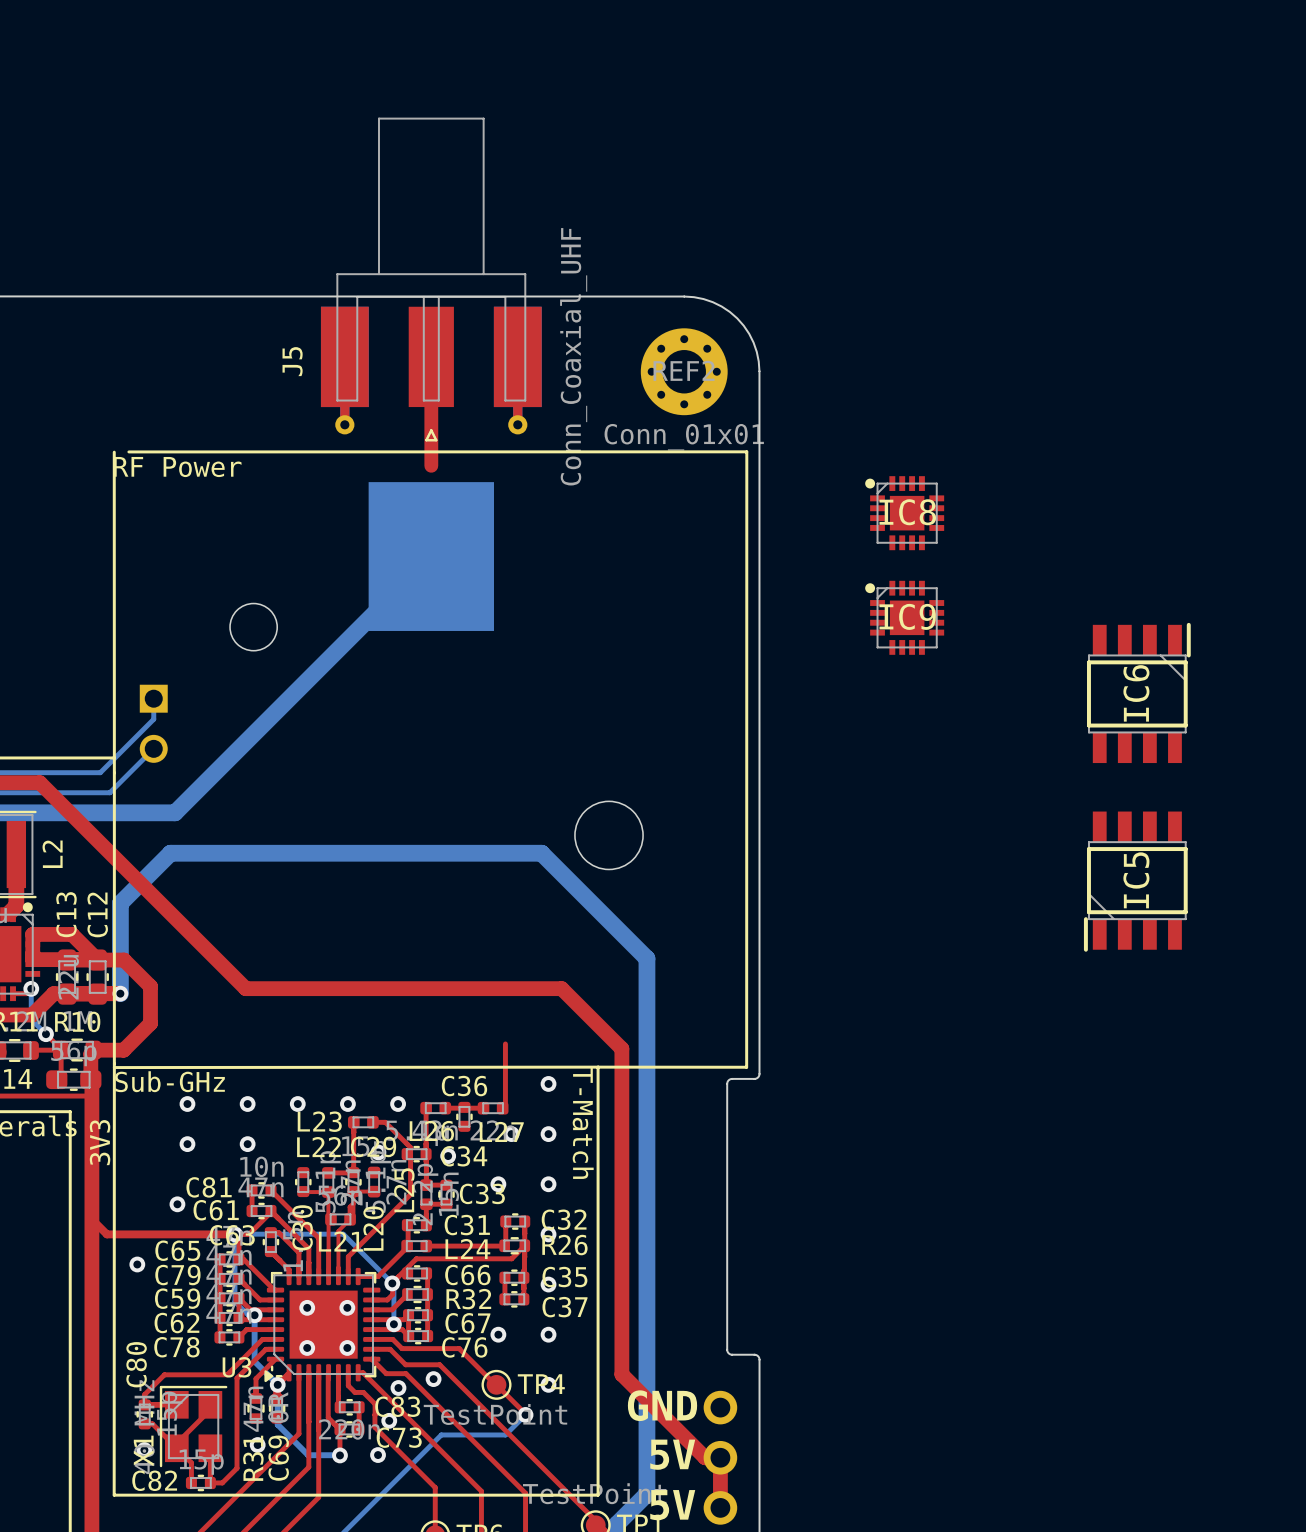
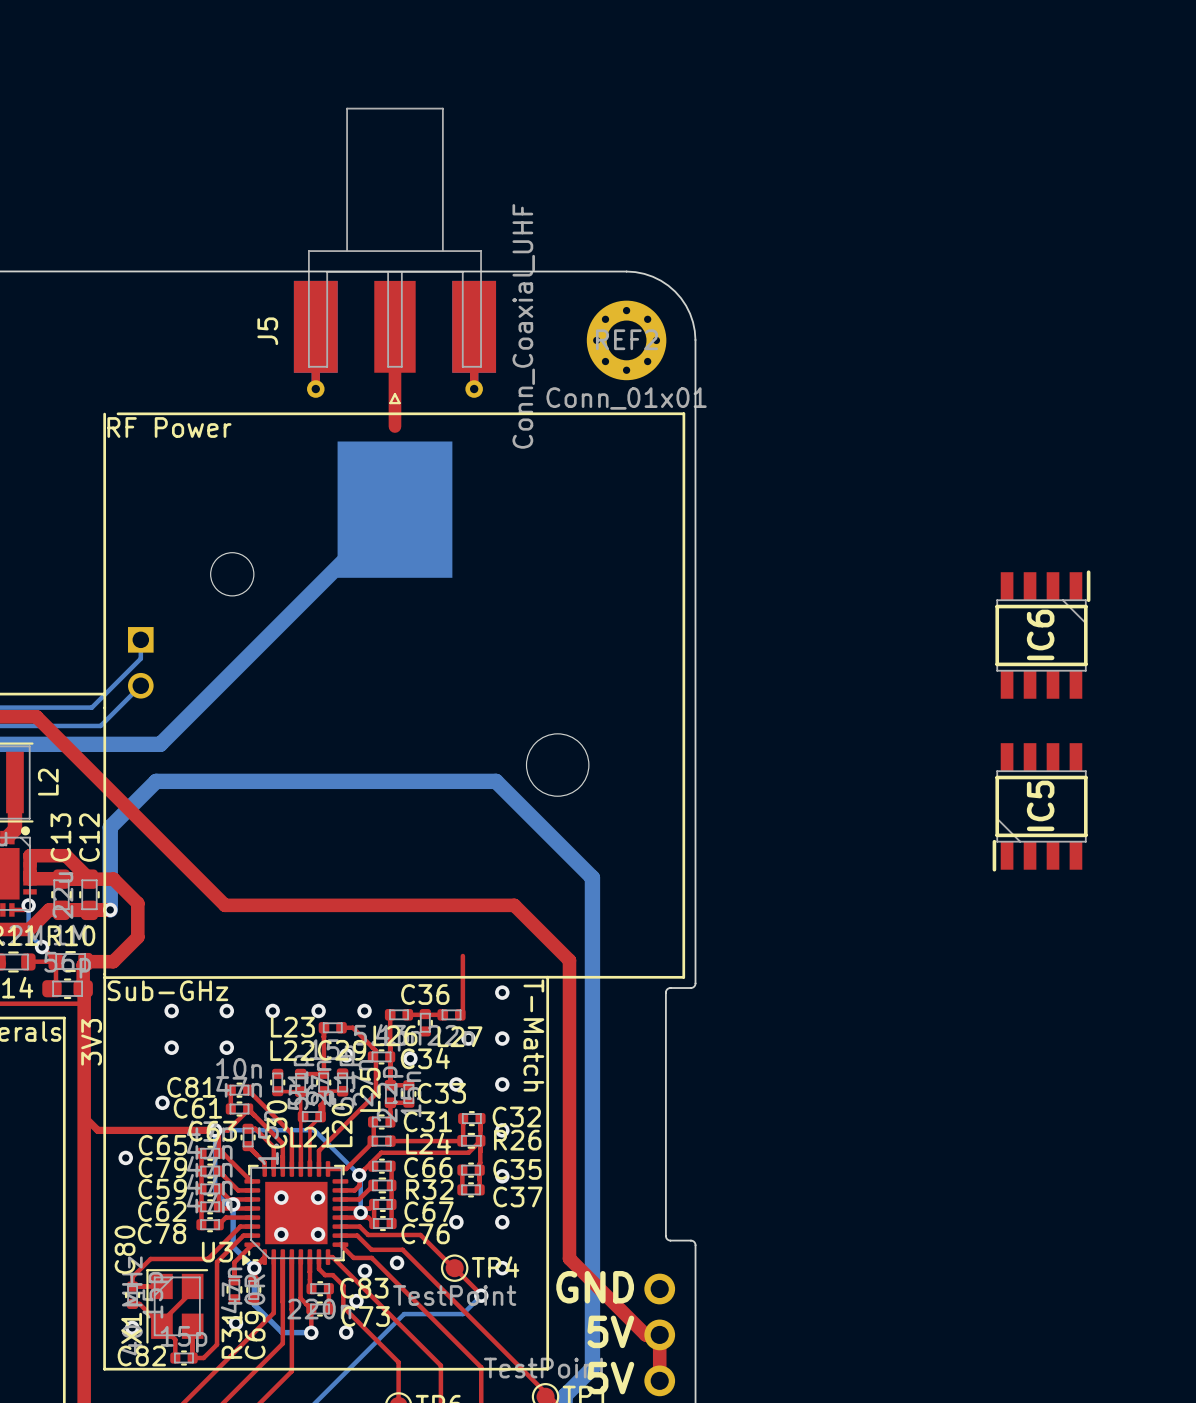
IC8: (904, 513) -> none
IC9: (904, 617) -> none

